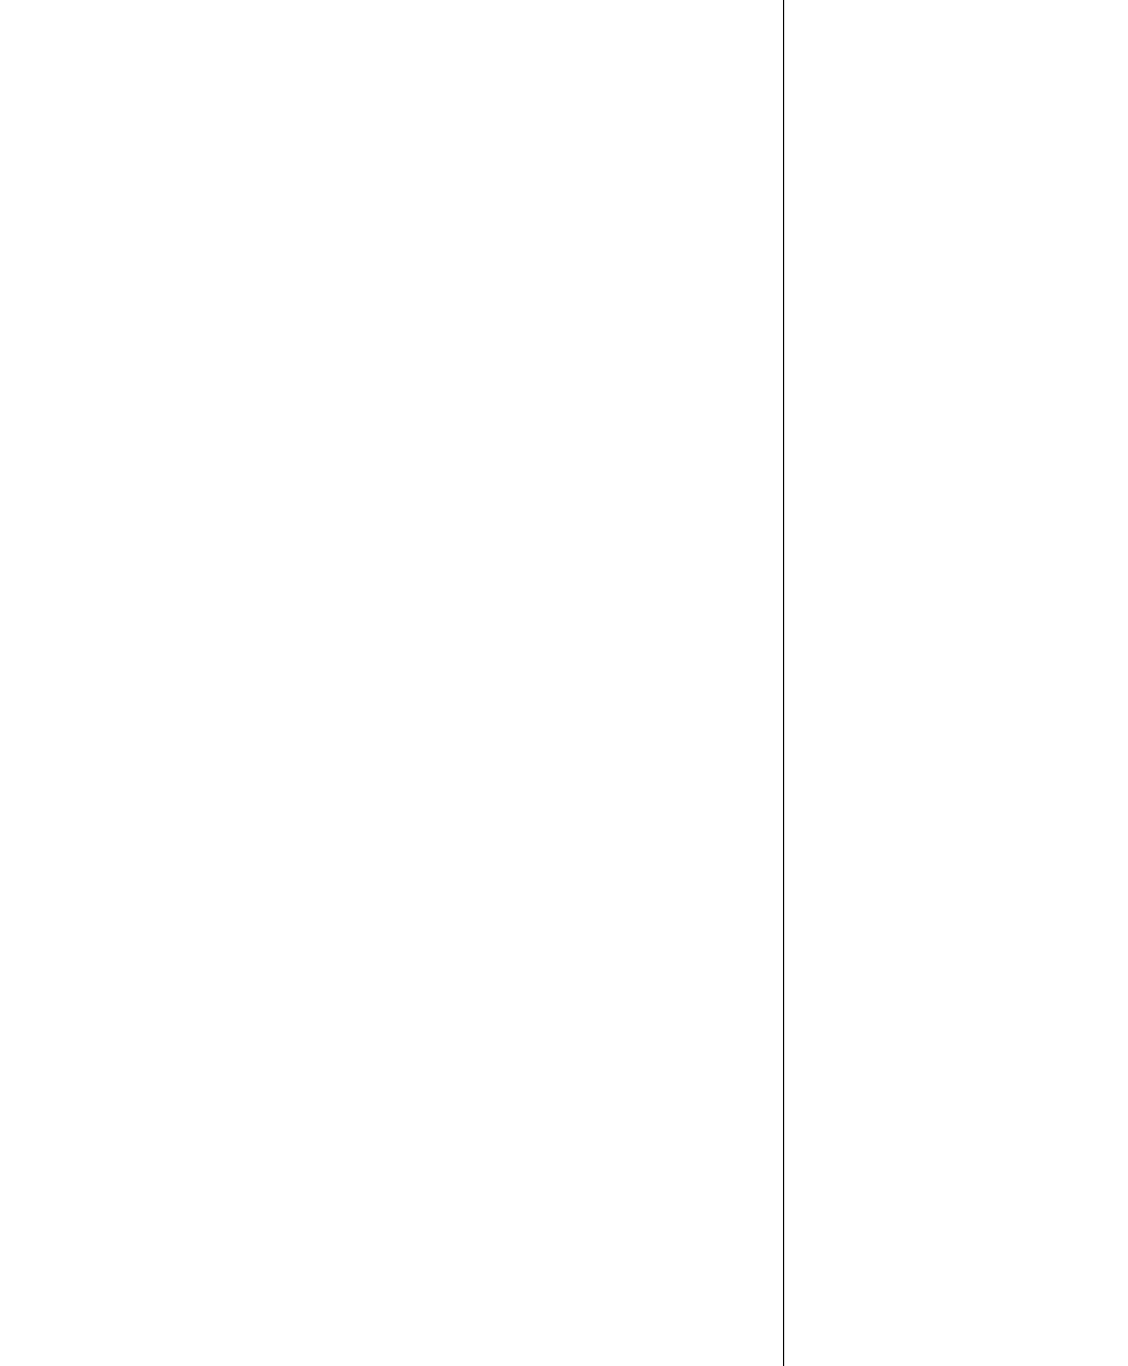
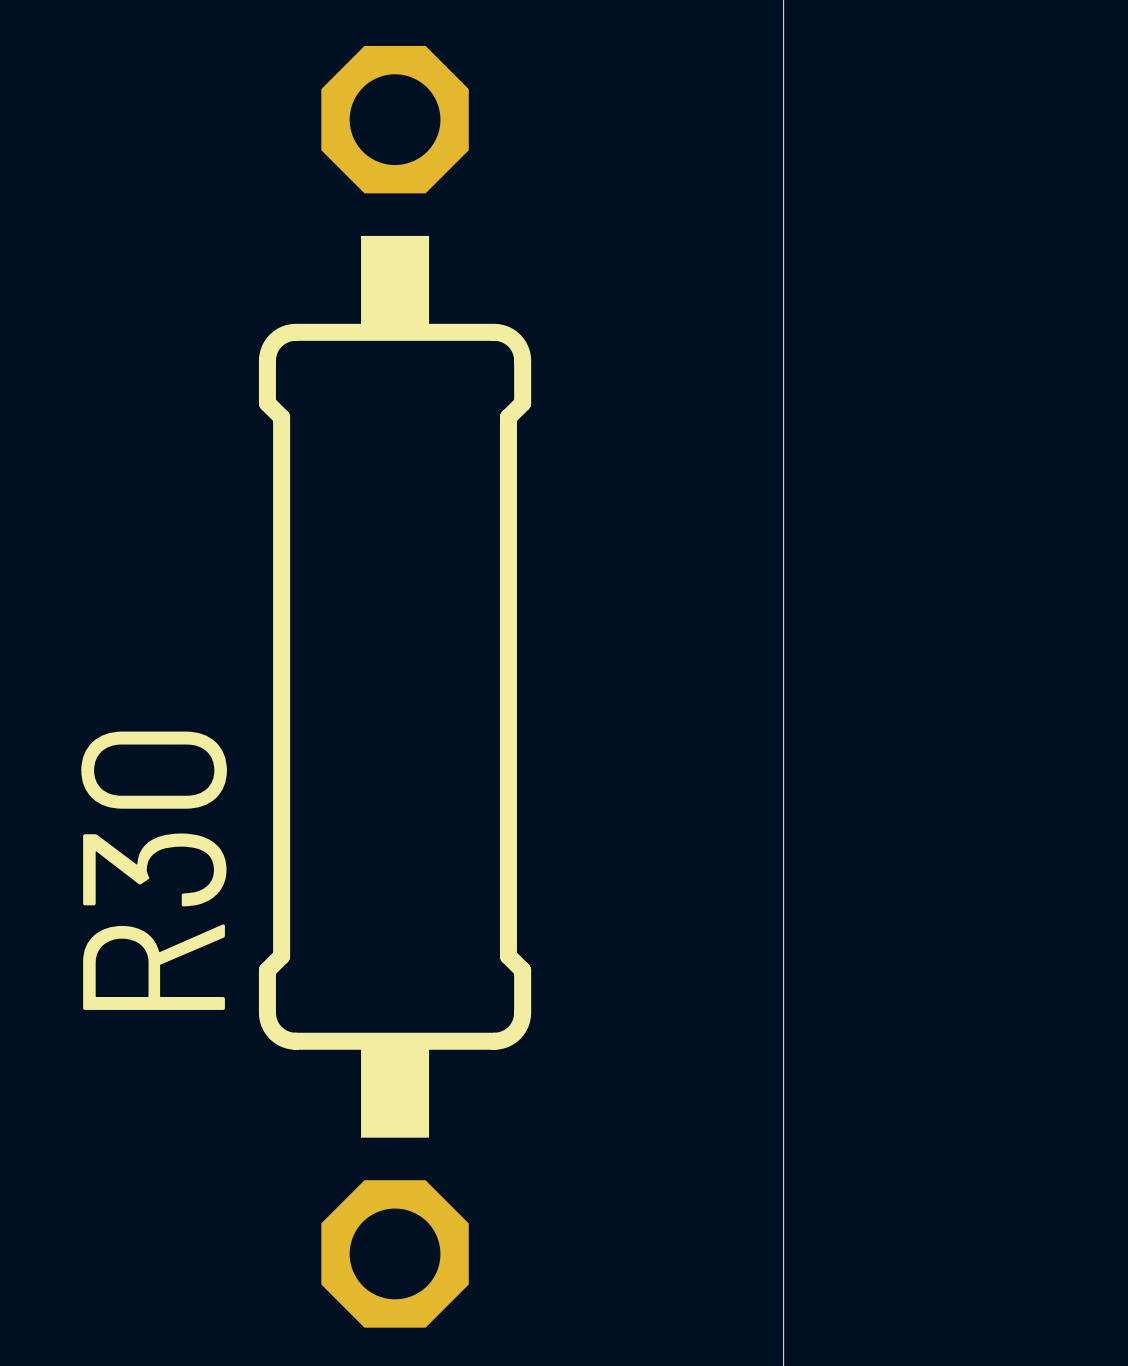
R30: none -> (395, 686)

